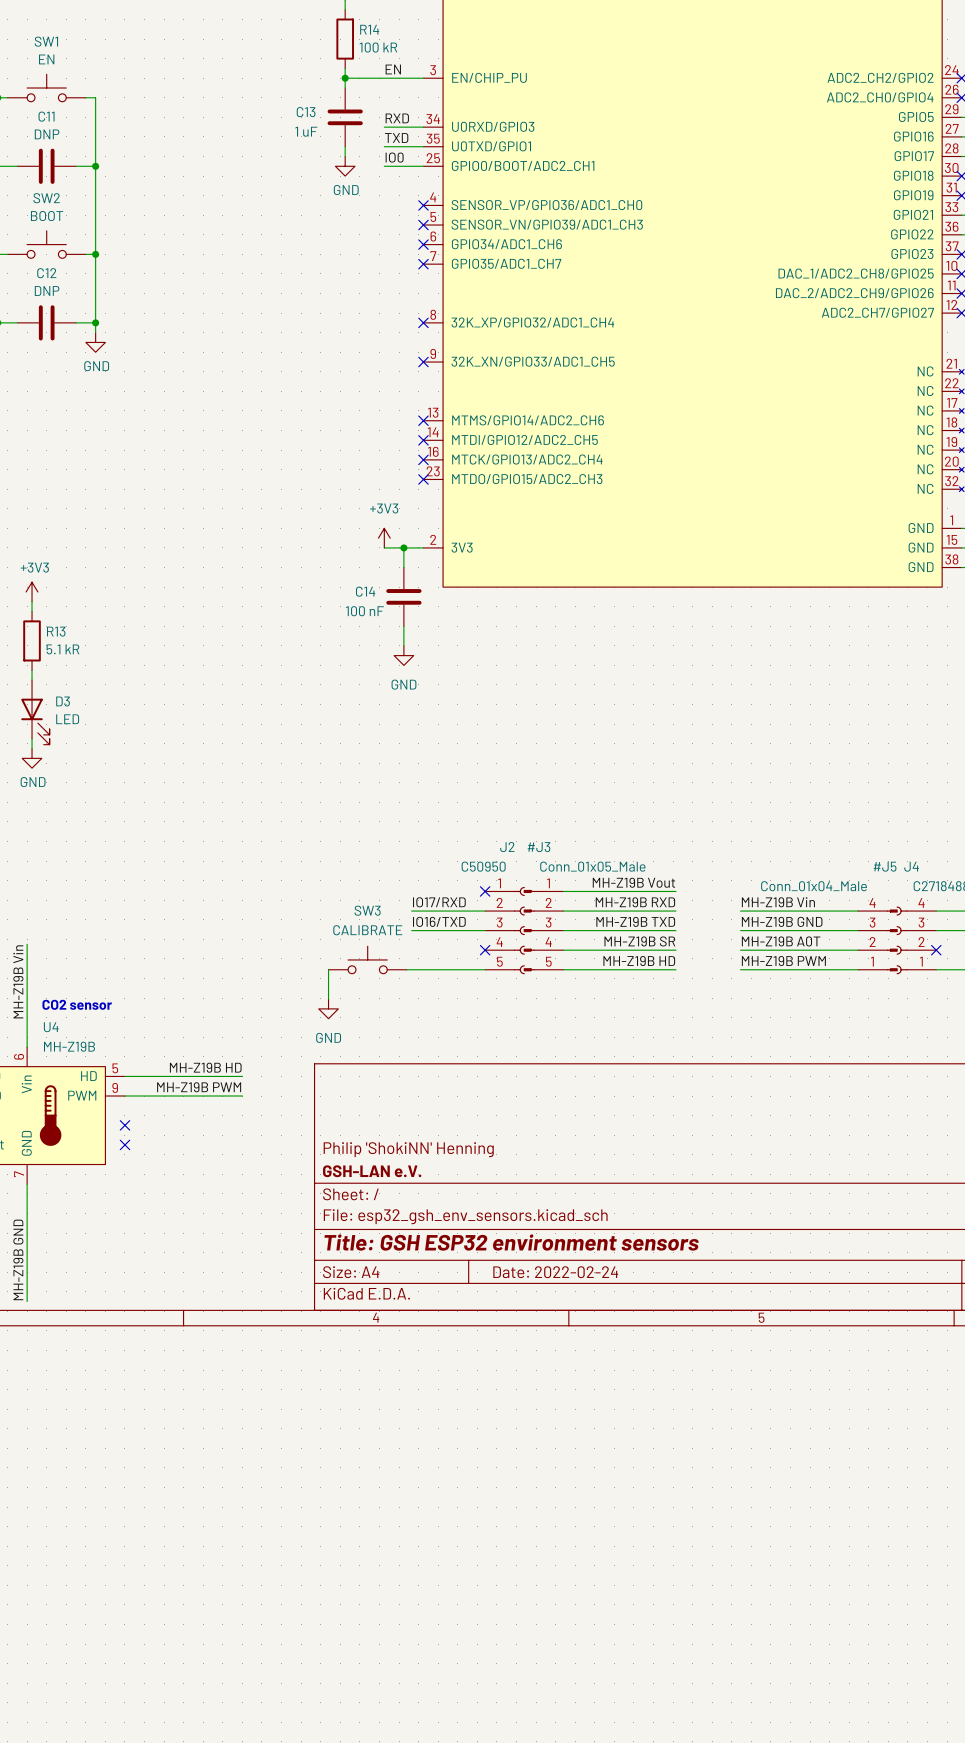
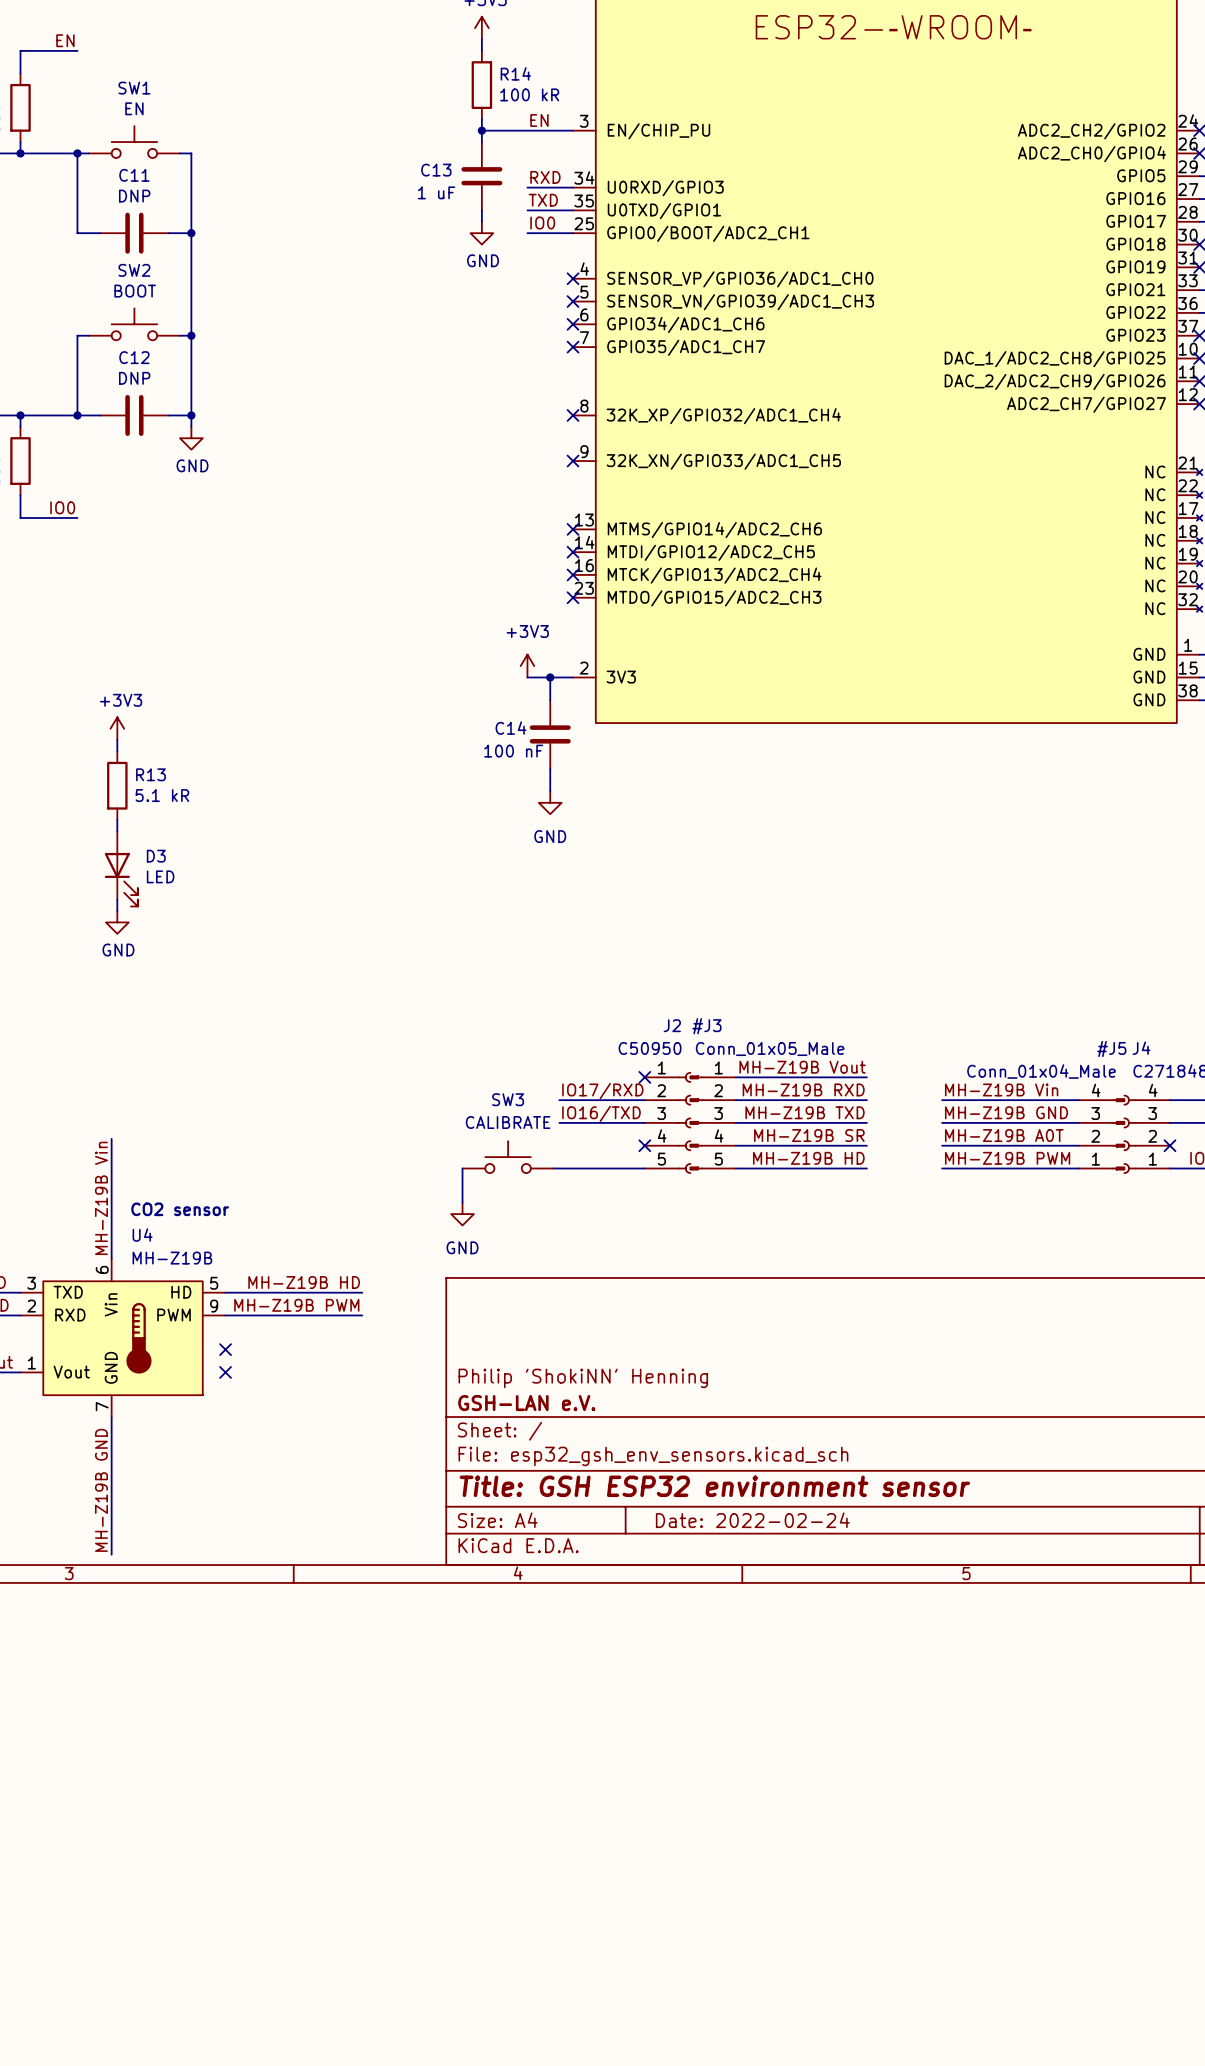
title block: Title: GSH ESP32 environment sensors (511, 1242) -> Title: GSH ESP32 environment sensor (714, 1486)

